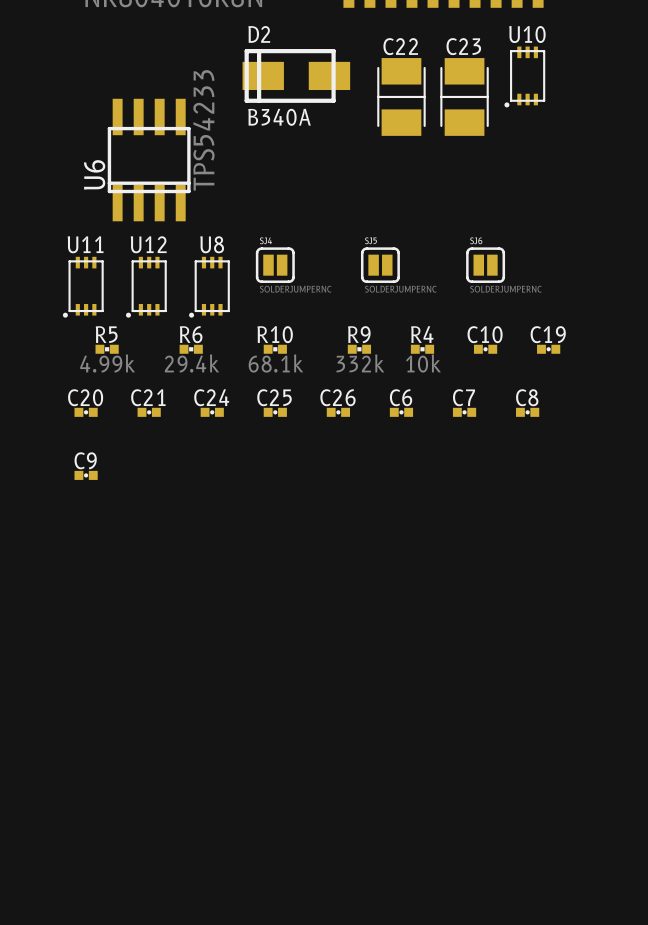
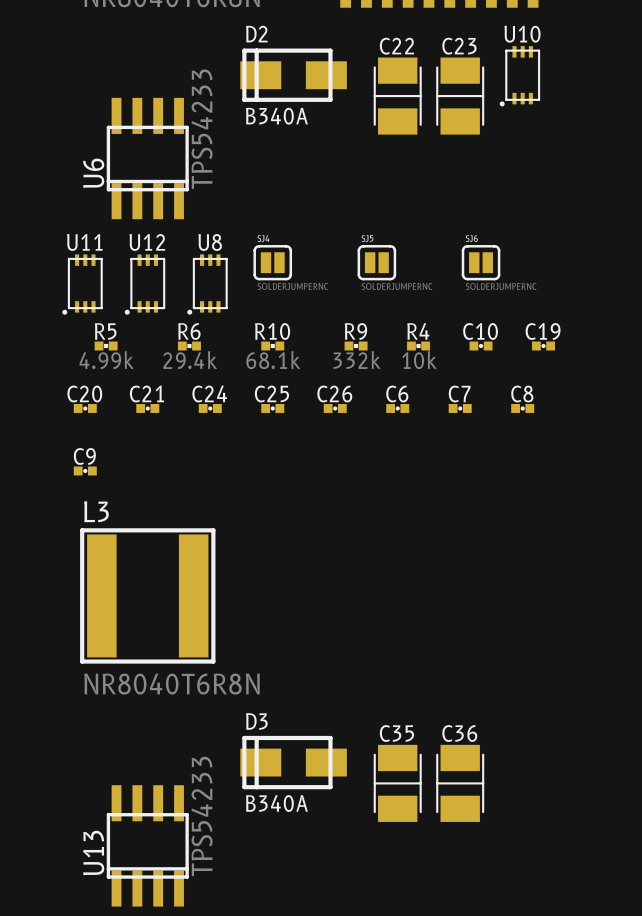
L3: none -> NR8040T6R8N (147, 595)
D3: none -> B340A (293, 762)
C35: none -> (397, 783)
C36: none -> (460, 783)
U13: none -> TPS54233 (147, 845)

